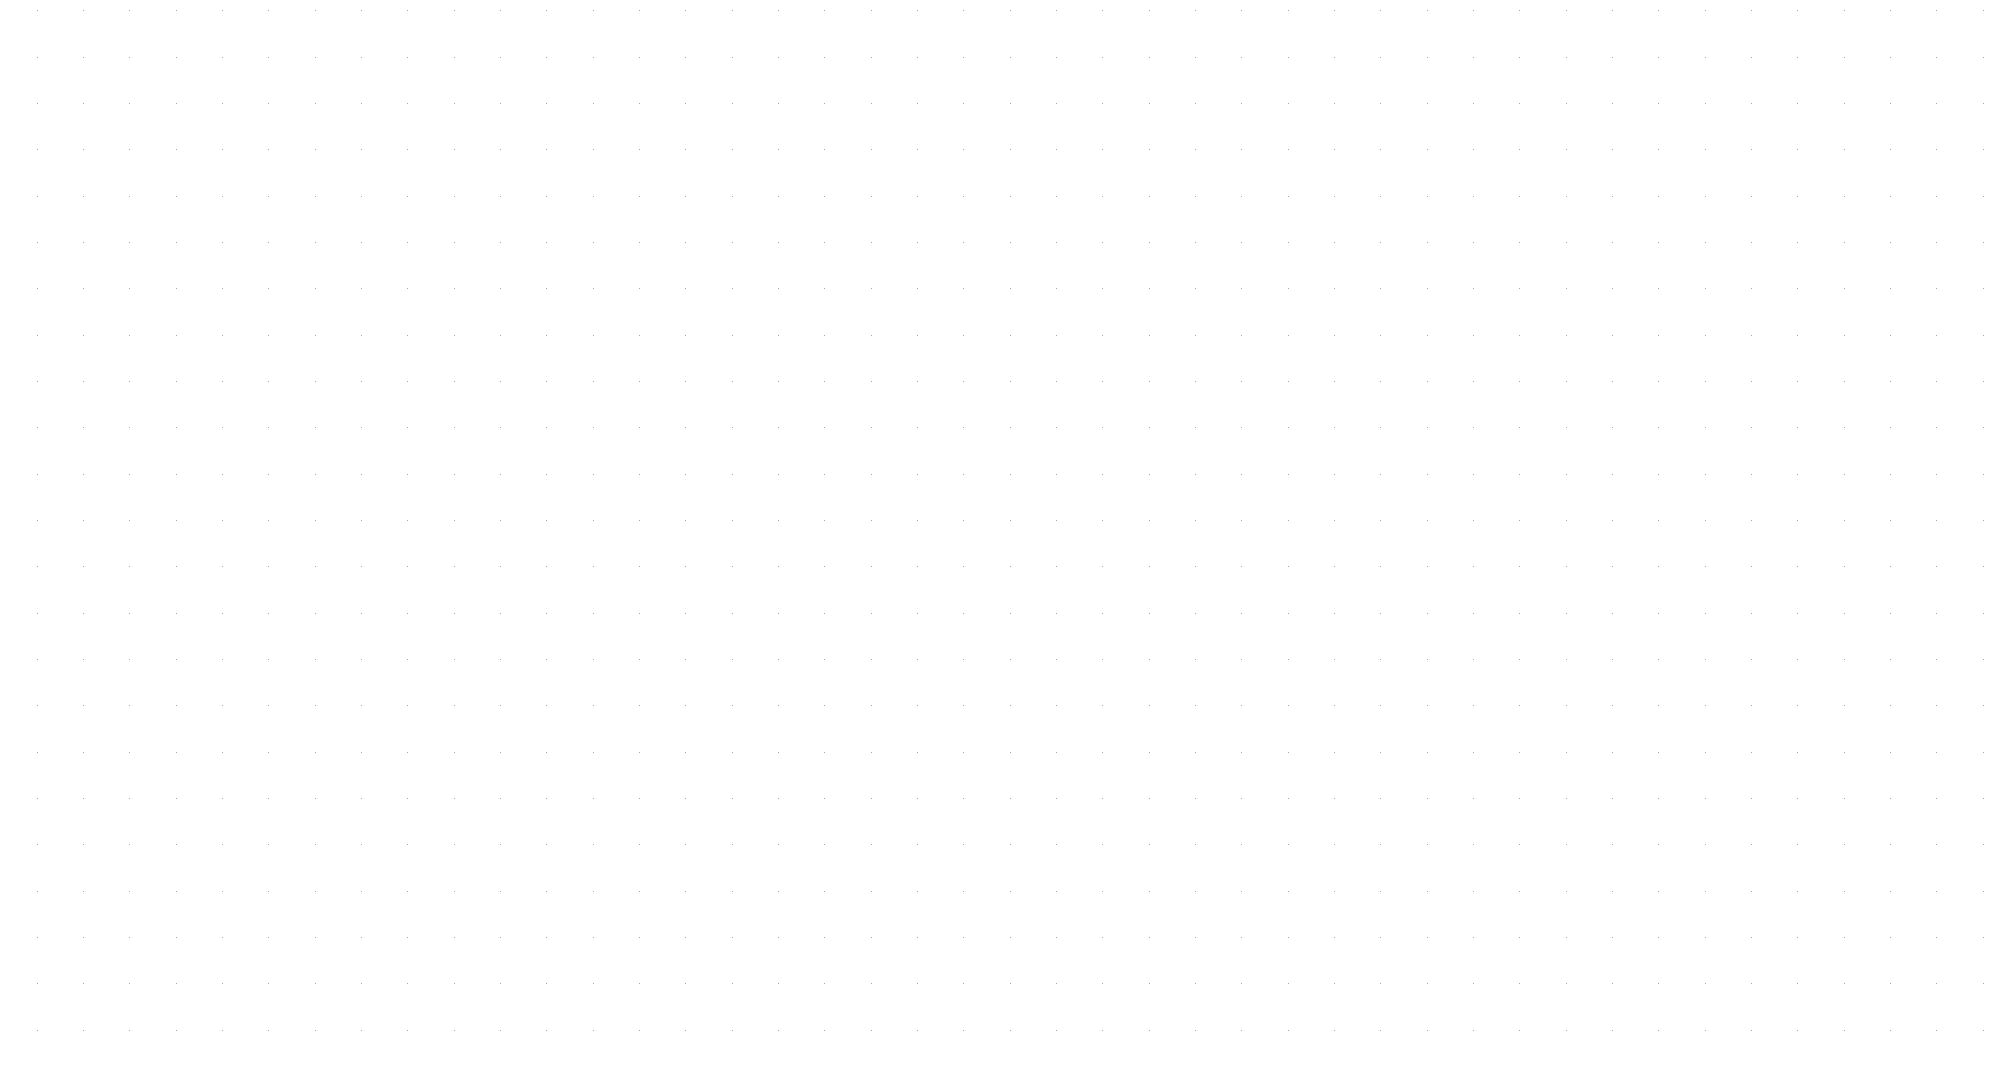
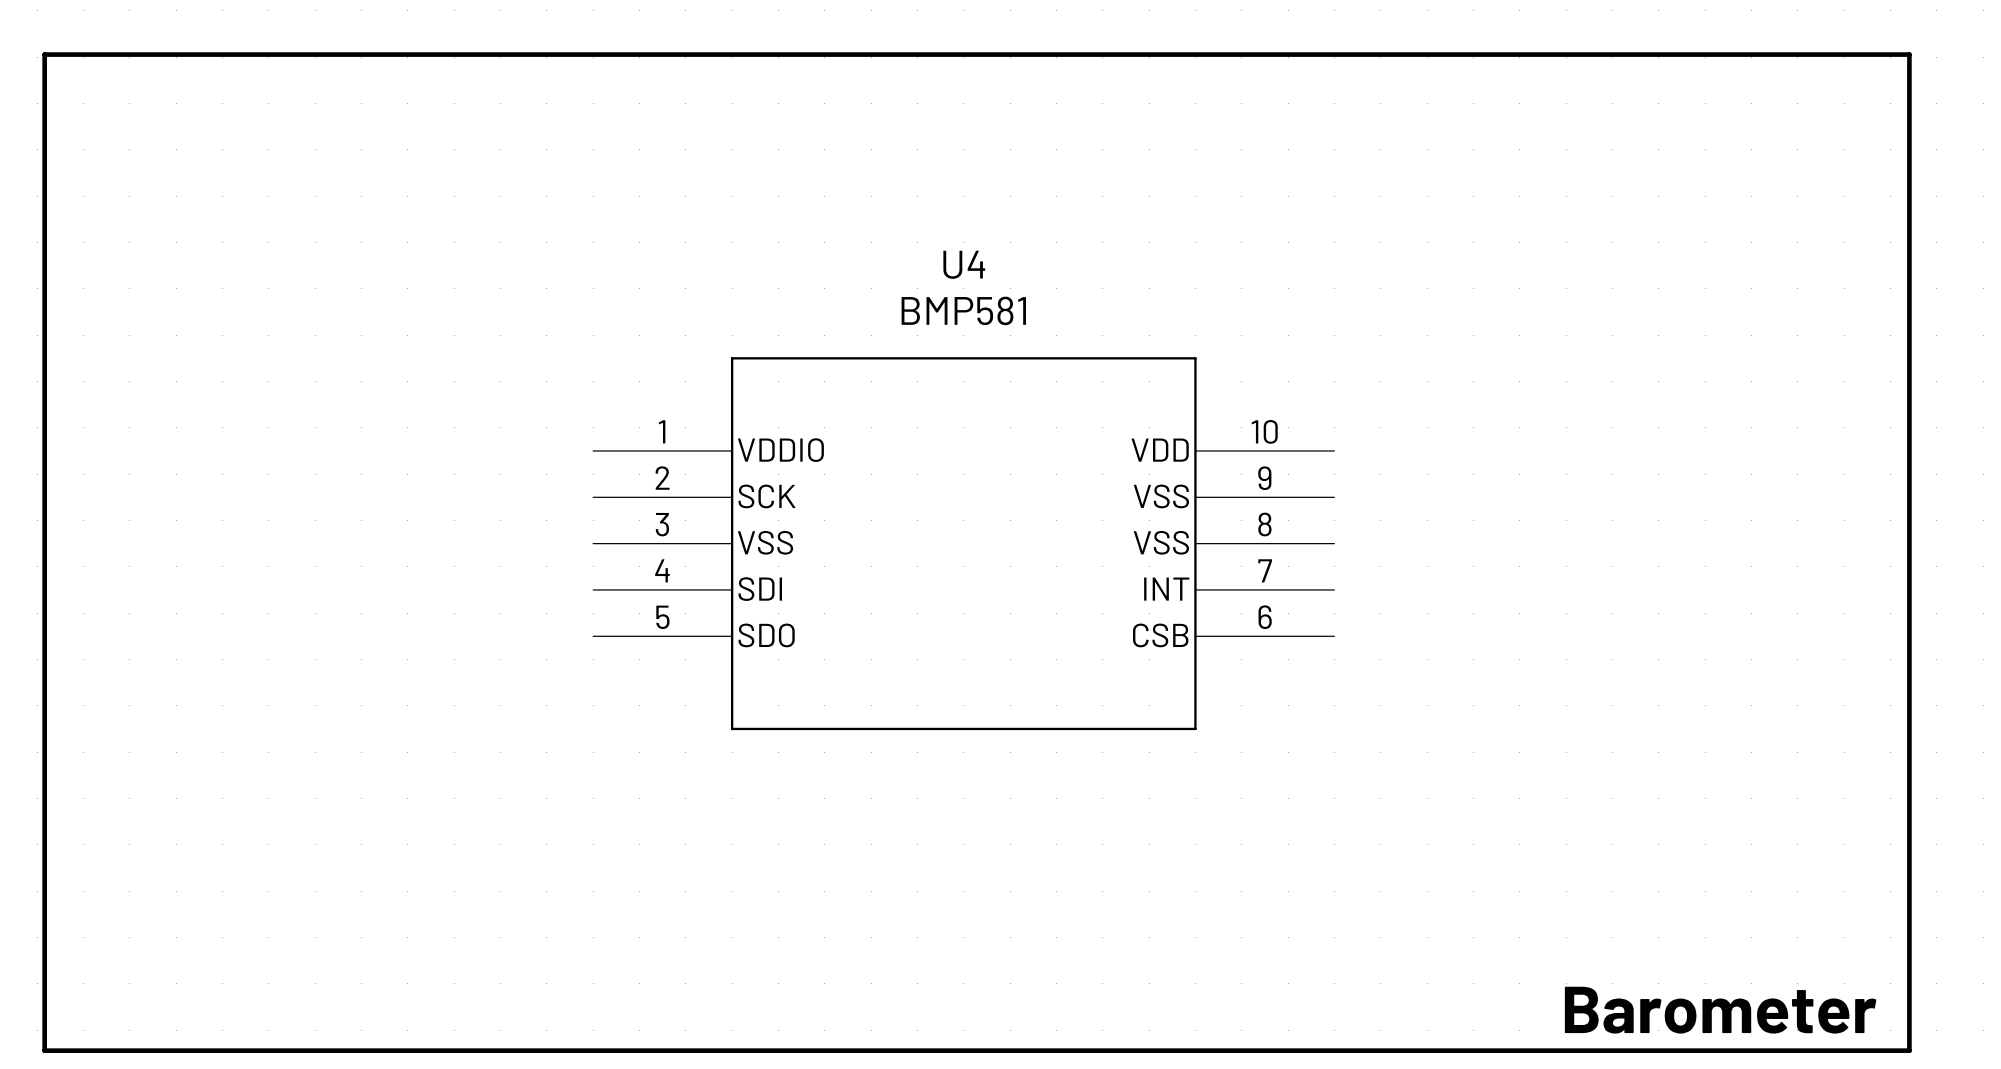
line: none -> (44, 54) (1909, 54) (1909, 1050) (44, 1050) (44, 54)
U4: none -> BMP581 (963, 543)
text: none -> Barometer (1720, 1010)

